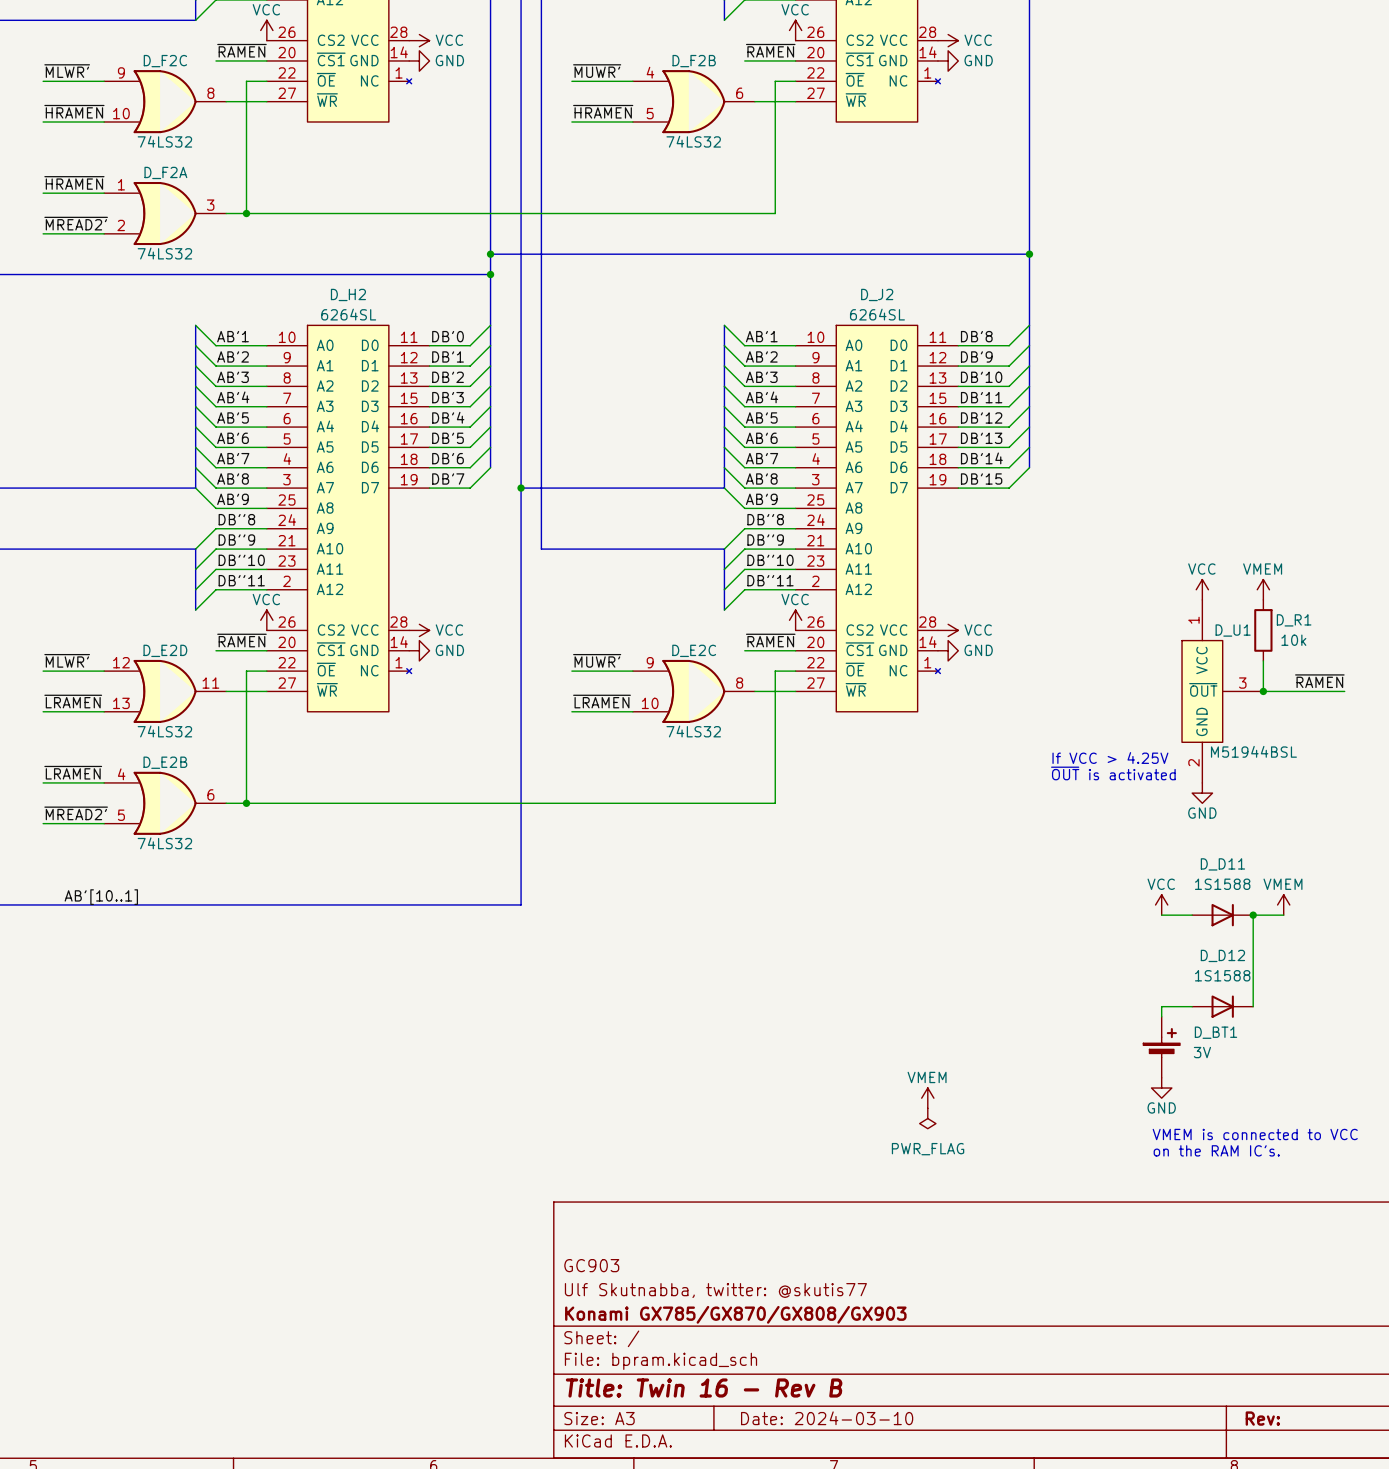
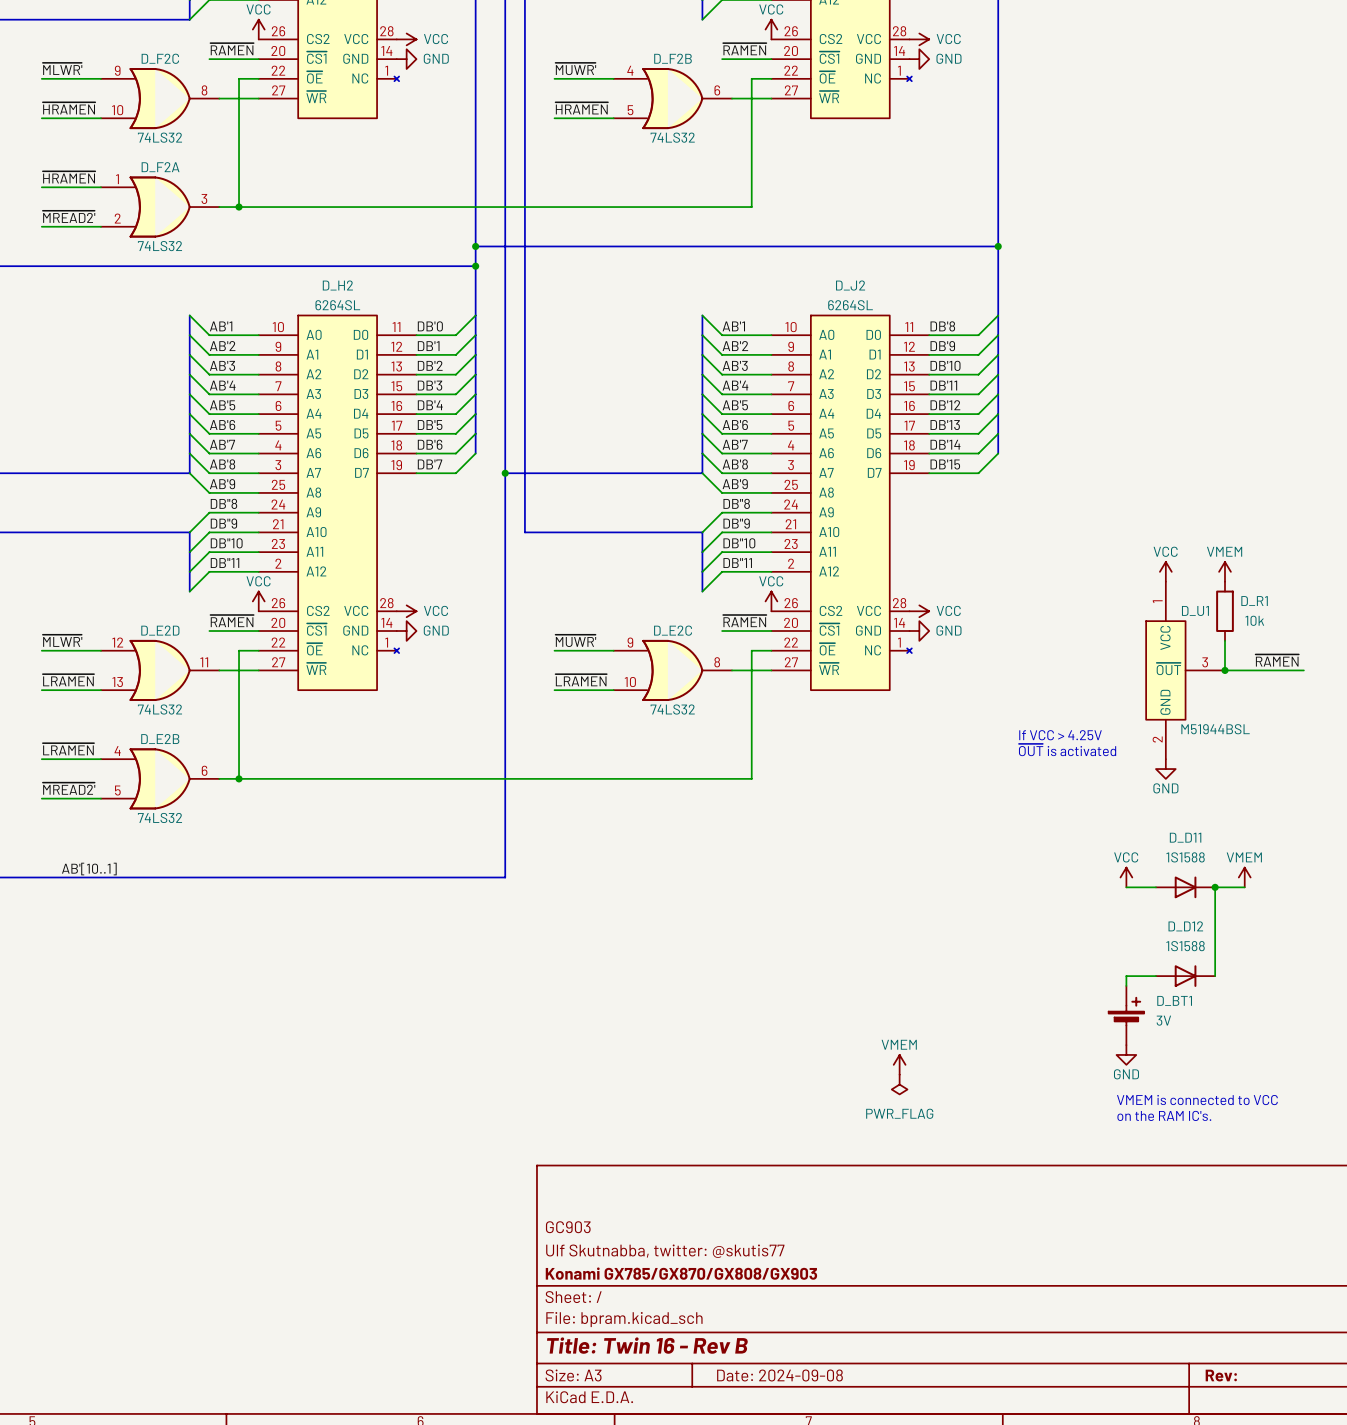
title block: Date: 2024-03-10 (827, 1418) -> Date: 2024-09-08 (779, 1375)

